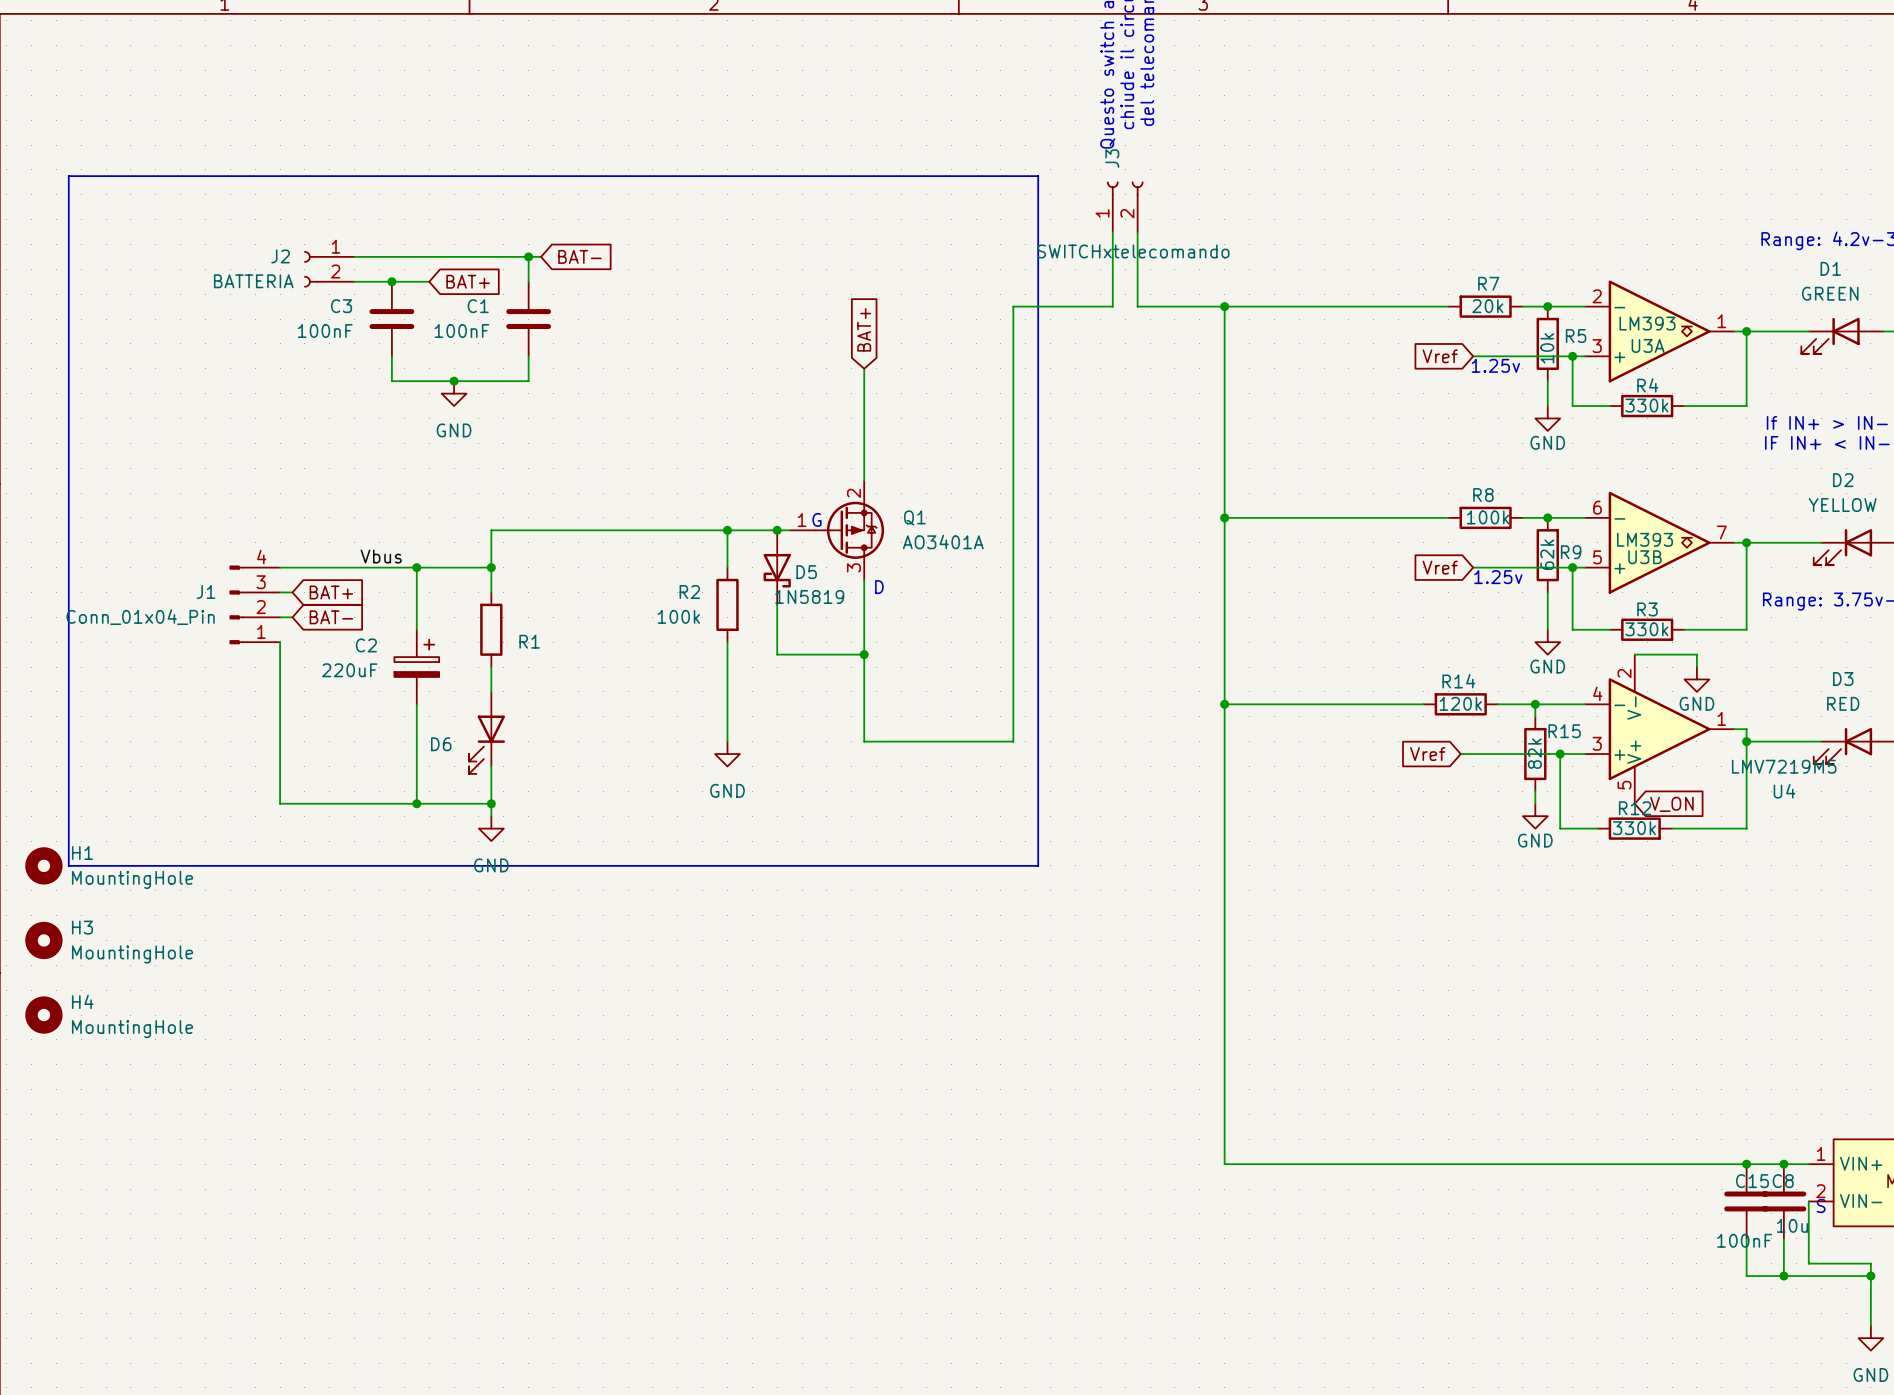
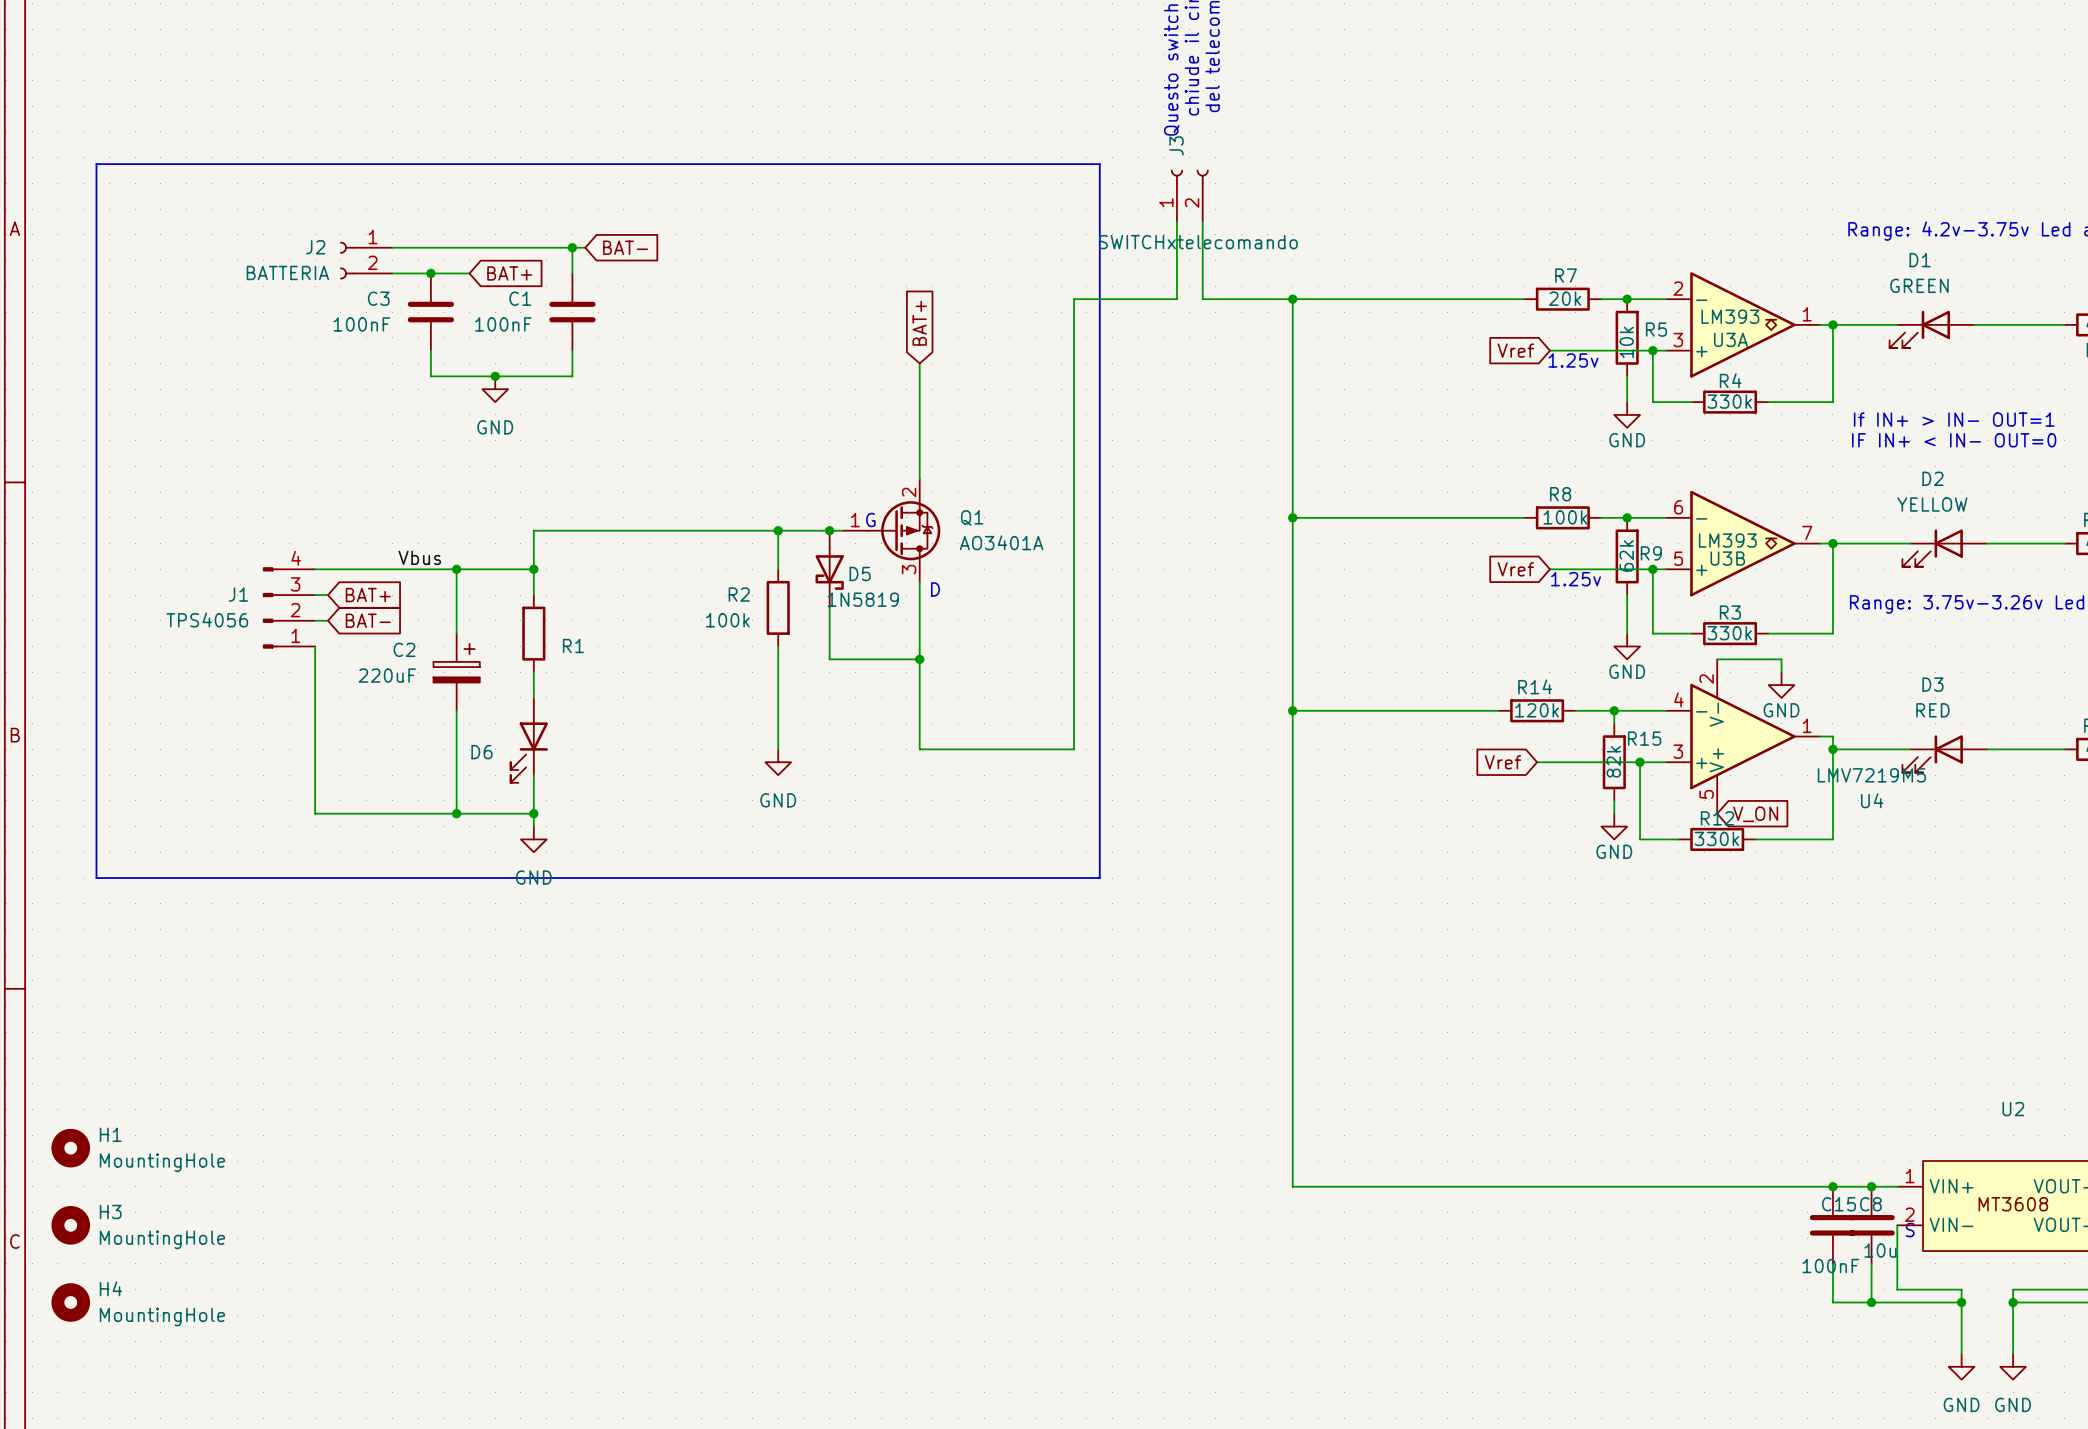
J1 value: Conn_01x04_Pin (140, 617) -> TPS4056 (207, 619)
H1 position: (43, 865) -> (70, 1148)
H3 position: (43, 940) -> (70, 1225)
H4 position: (43, 1015) -> (70, 1302)

